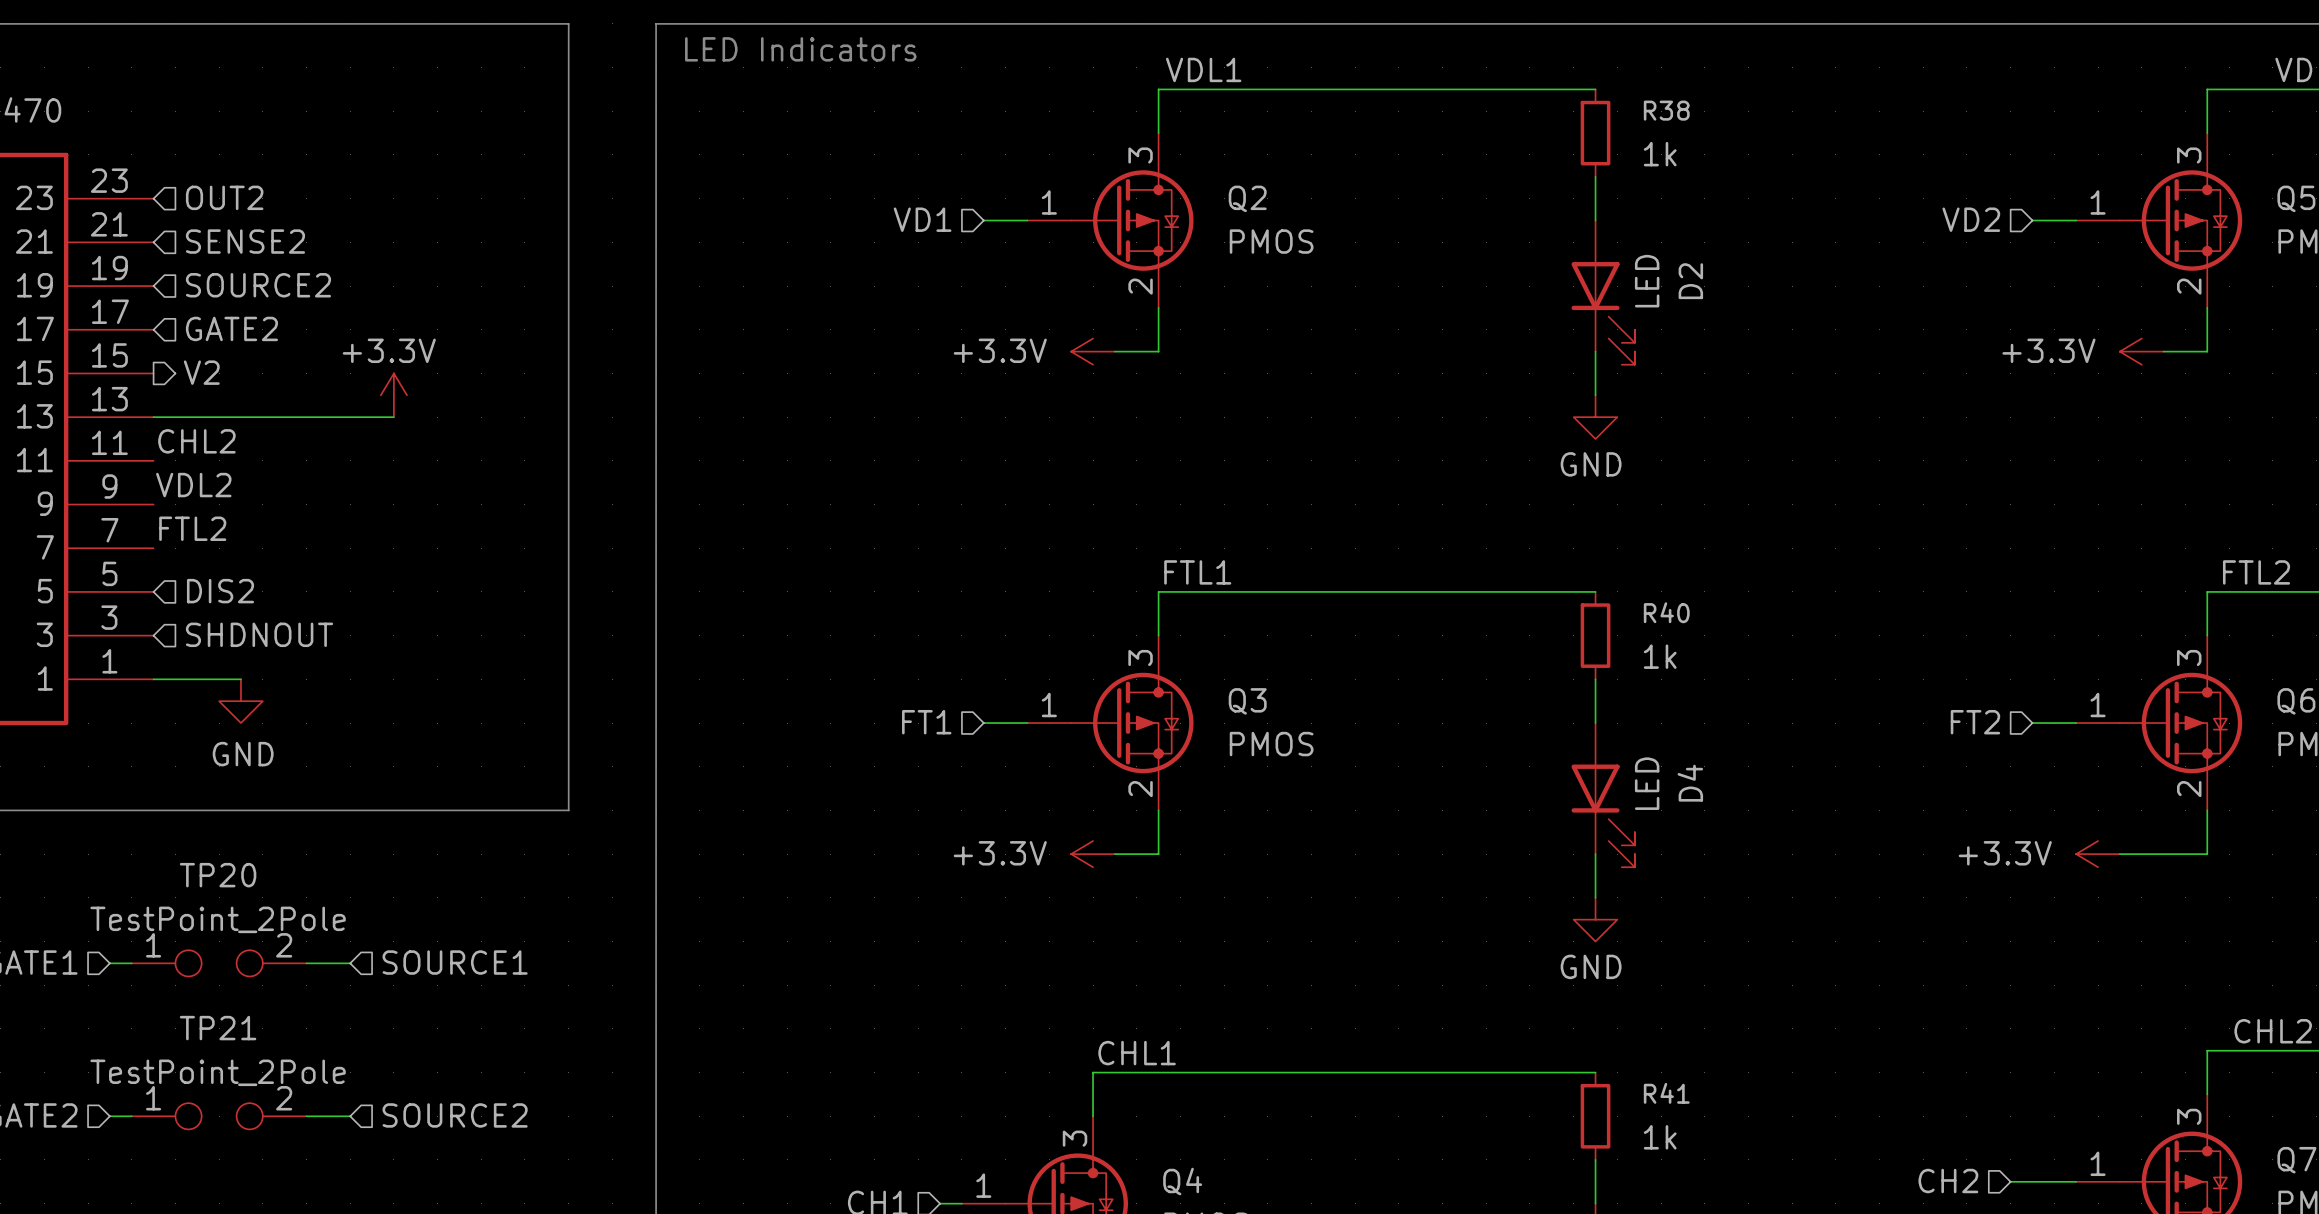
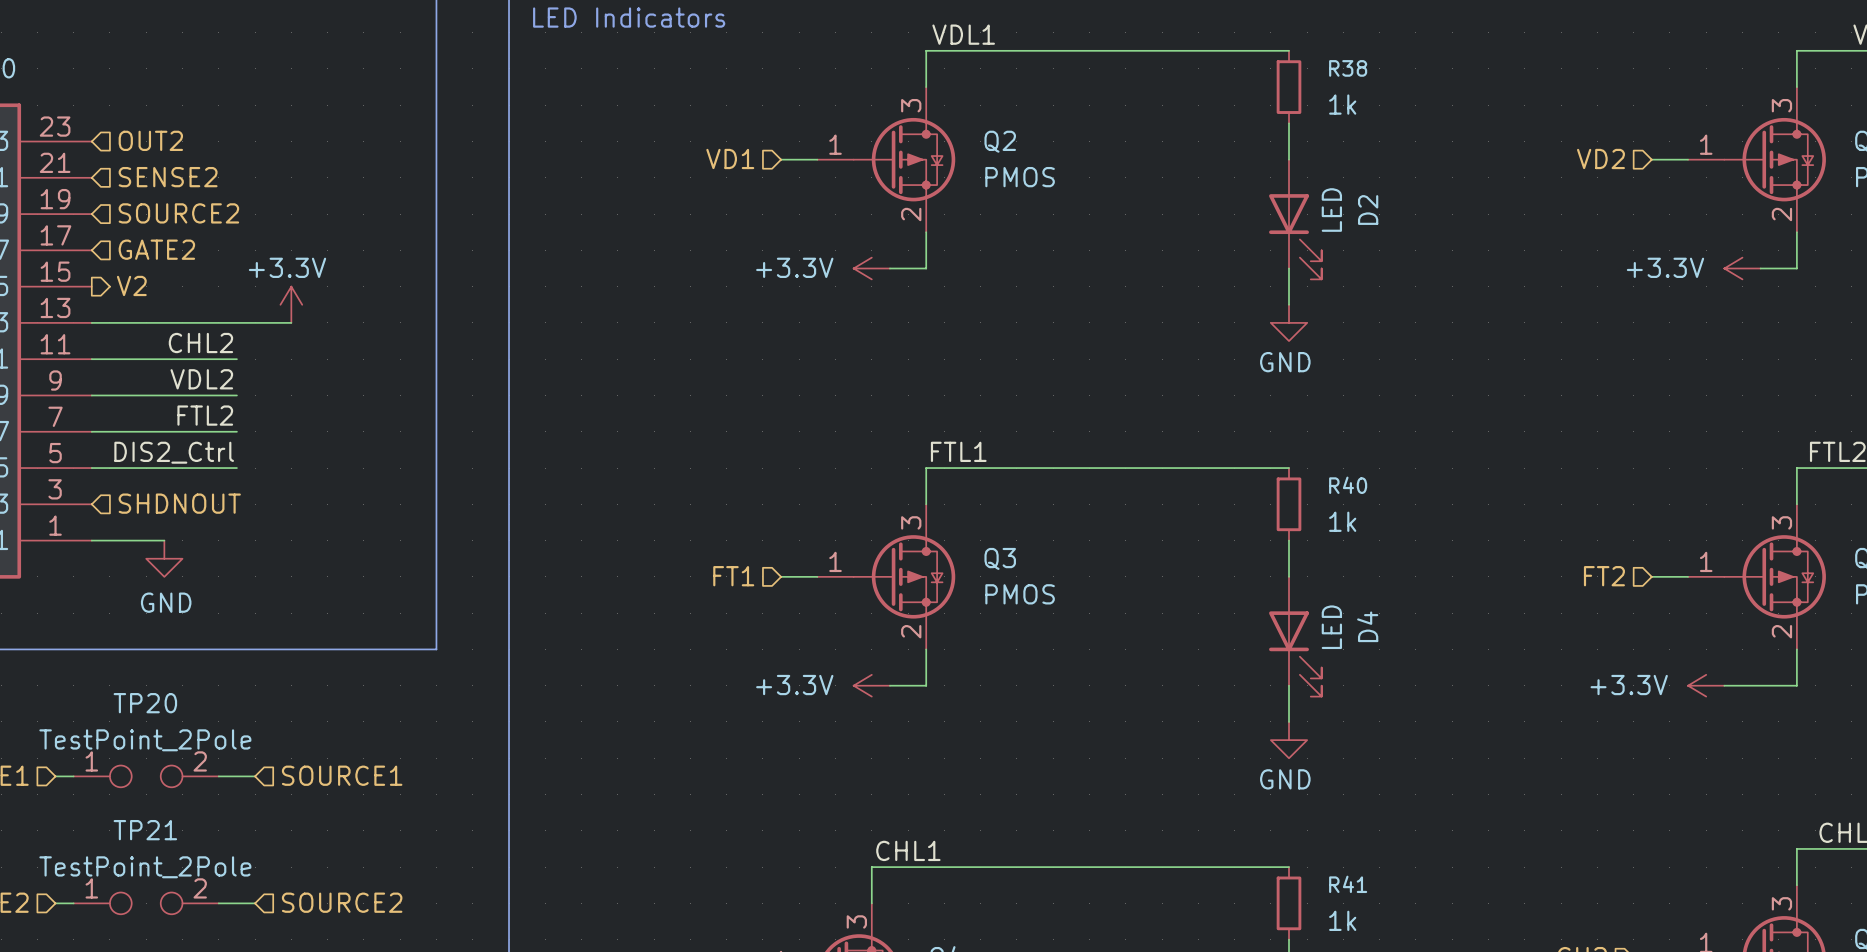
label position: CHL2 (196, 441) -> CHL2 (200, 343)
wire: none -> (91, 359) (236, 359)
label position: VDL2 (193, 485) -> VDL2 (201, 379)
wire: none -> (91, 395) (236, 395)
label position: FTL2 (192, 528) -> FTL2 (205, 415)
wire: none -> (91, 431) (236, 431)
label: none -> DIS2_Ctrl (174, 452)
wire: none -> (91, 468) (236, 468)
hierarchical label: DIS2 (220, 591) -> none

